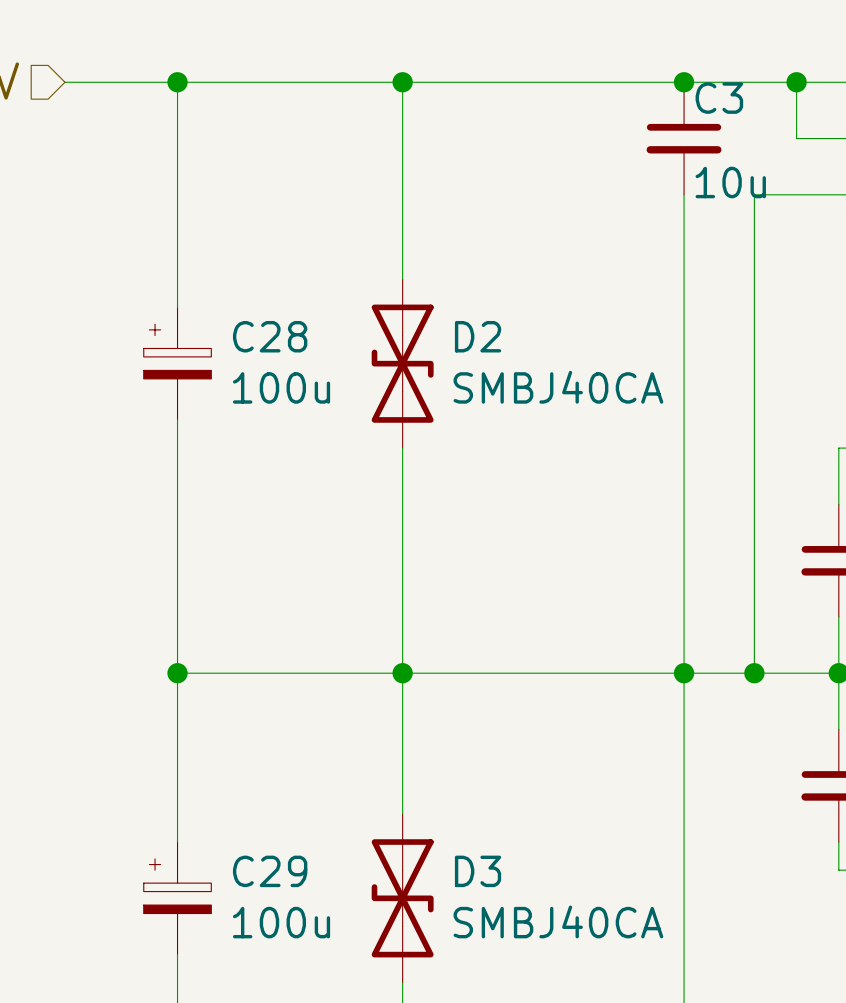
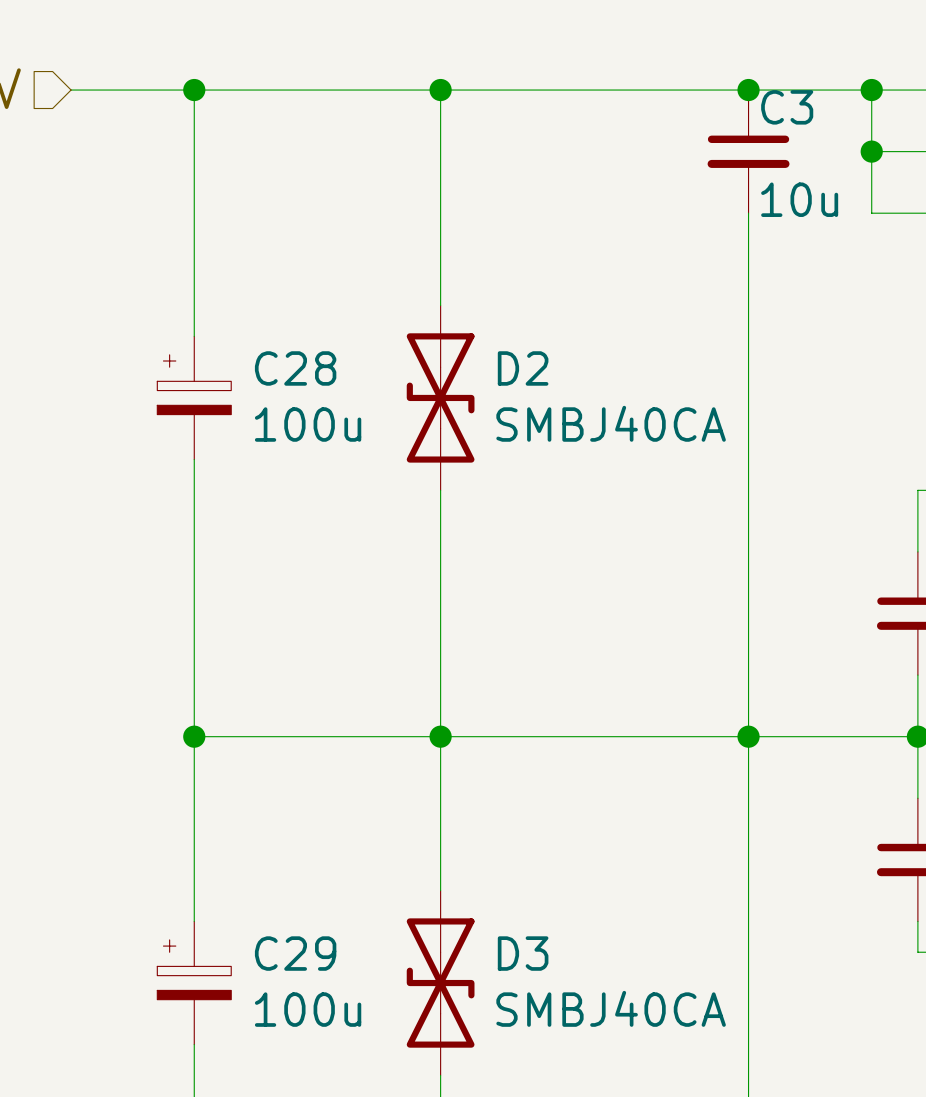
junction: none -> (871, 151)
wire: (796, 194) (754, 194) (754, 673) -> (871, 213) (871, 151)
junction: (754, 673) -> none

